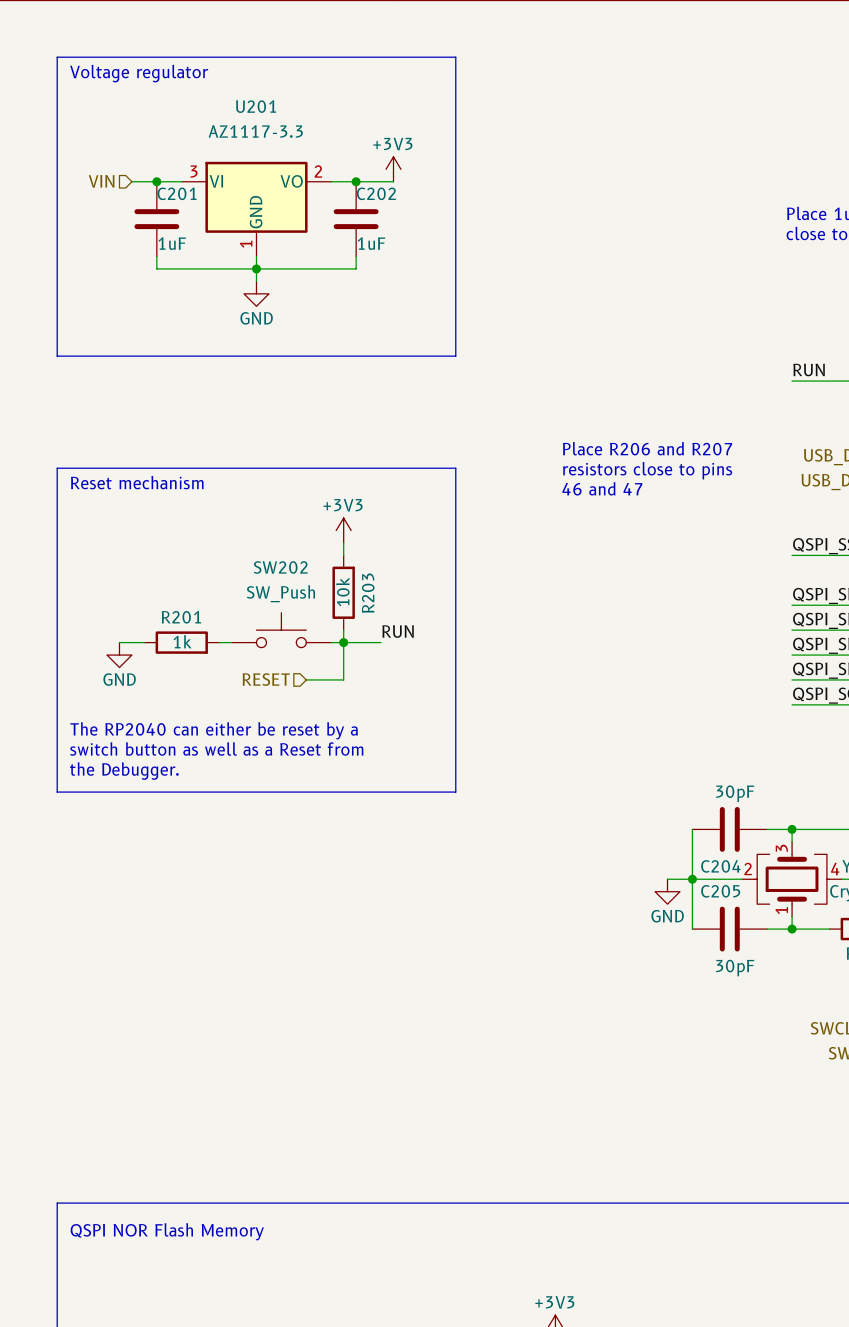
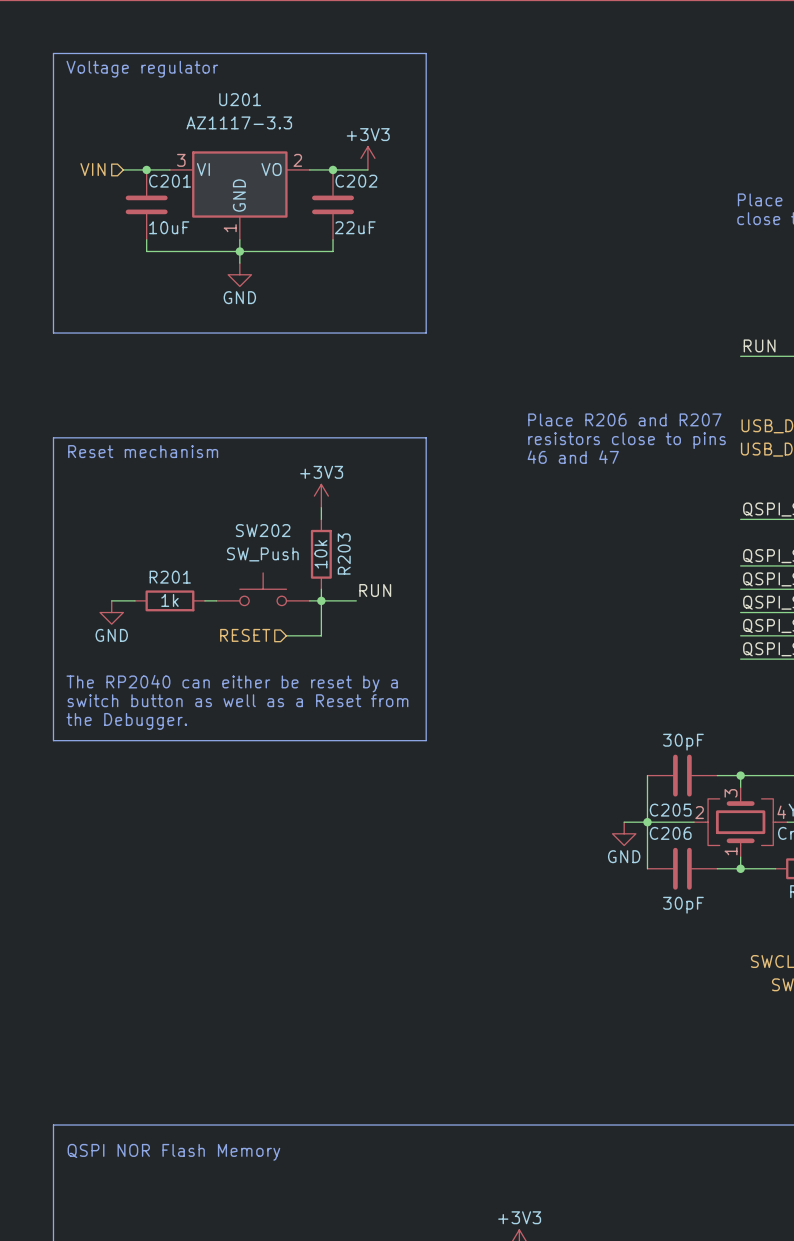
C201 value: 1uF (172, 243) -> 10uF (169, 227)
C202 value: 1uF (371, 243) -> 22uF (355, 227)
C204 name: C204 (720, 866) -> C205 (670, 810)
C205 name: C205 (720, 891) -> C206 (670, 833)

